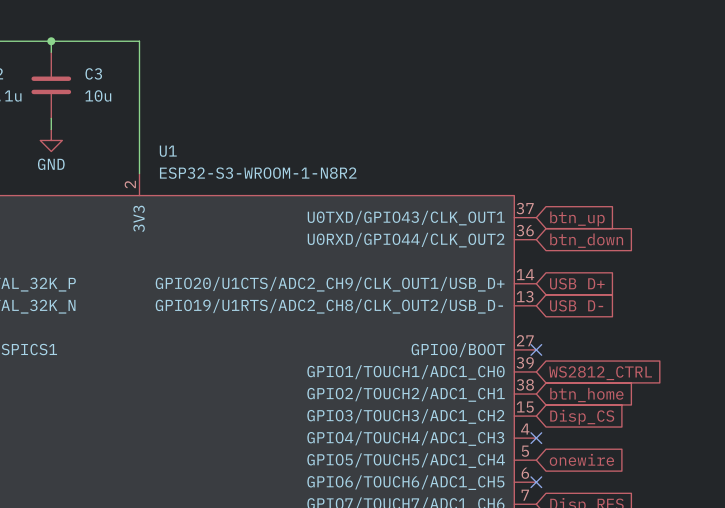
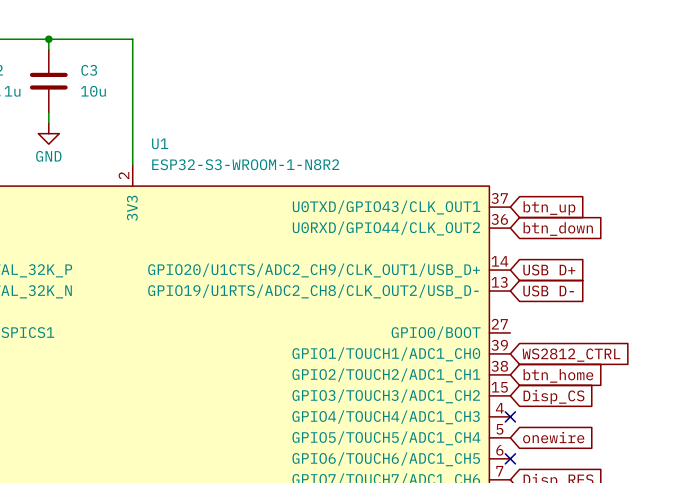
no-connect mark: (536, 349) -> none

